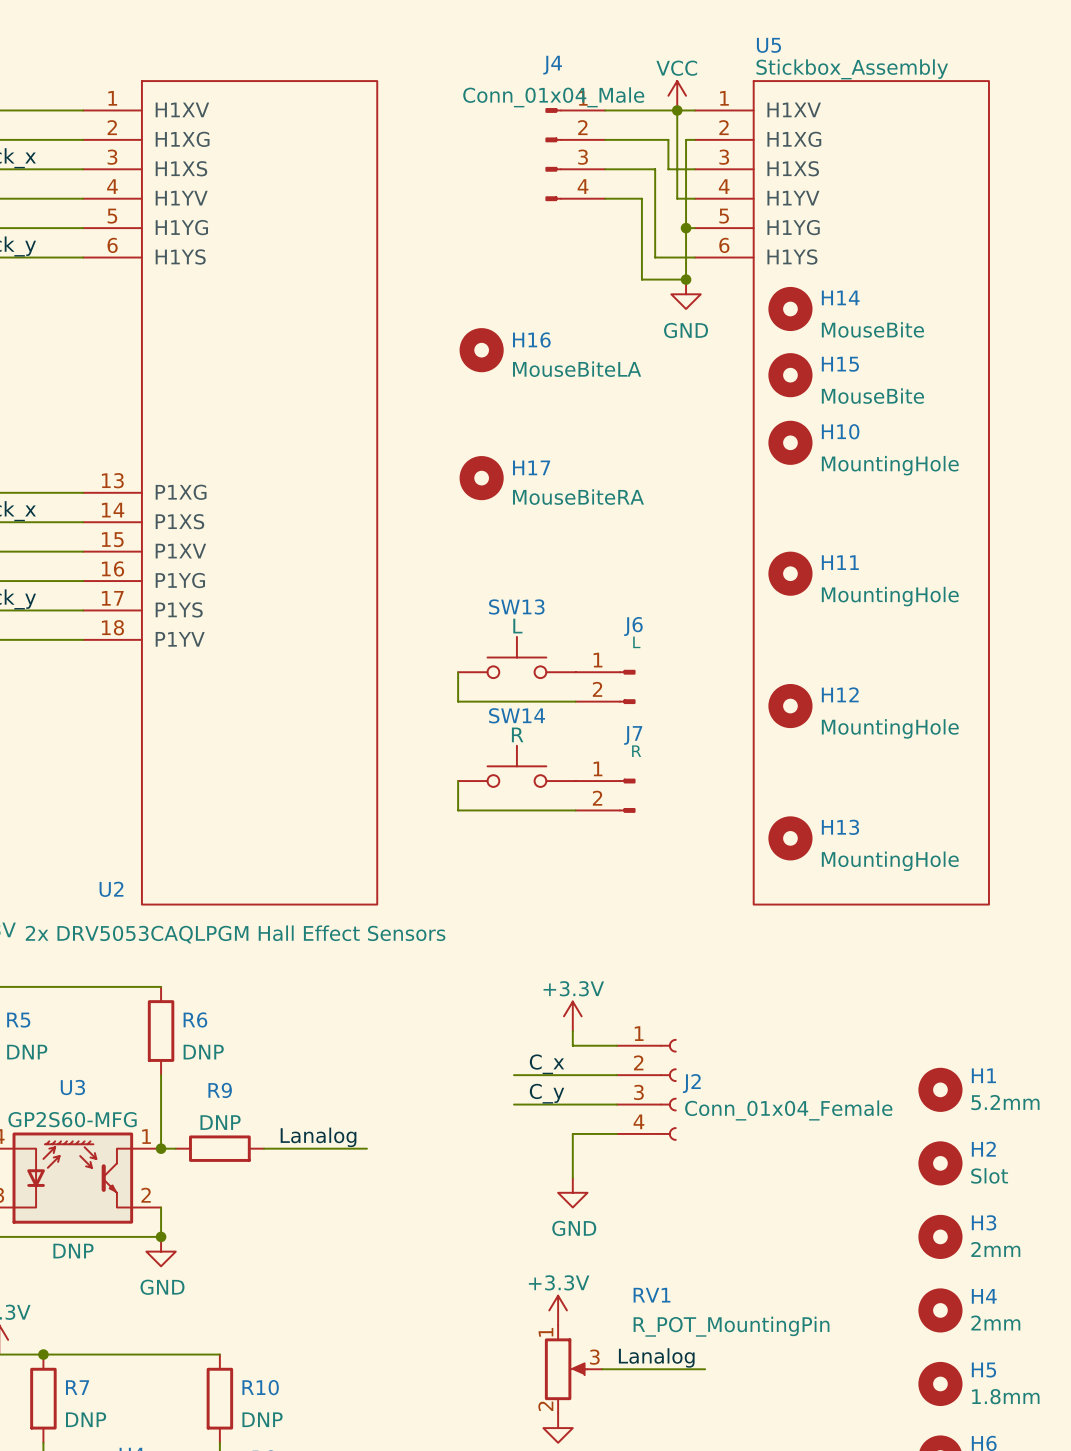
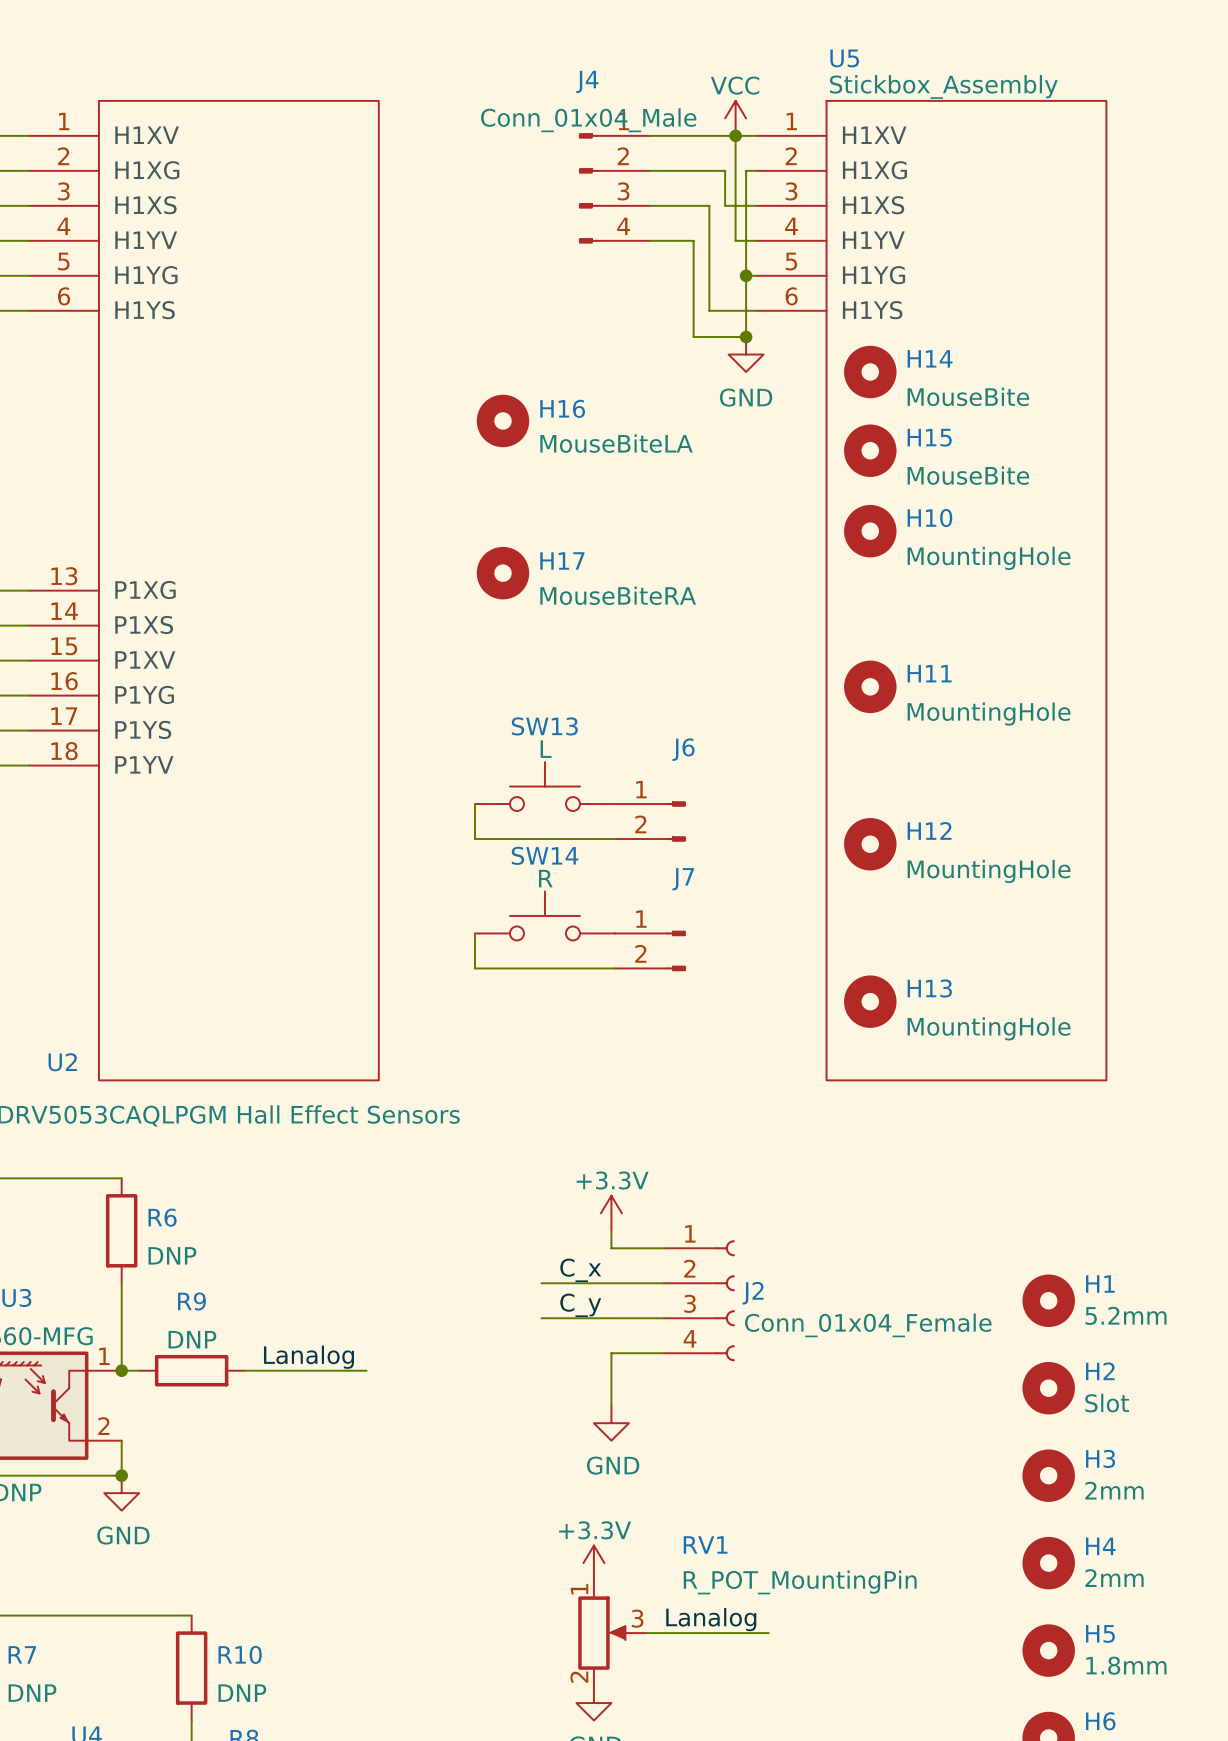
J6 value: L (636, 642) -> none
J7 value: R (636, 751) -> none

